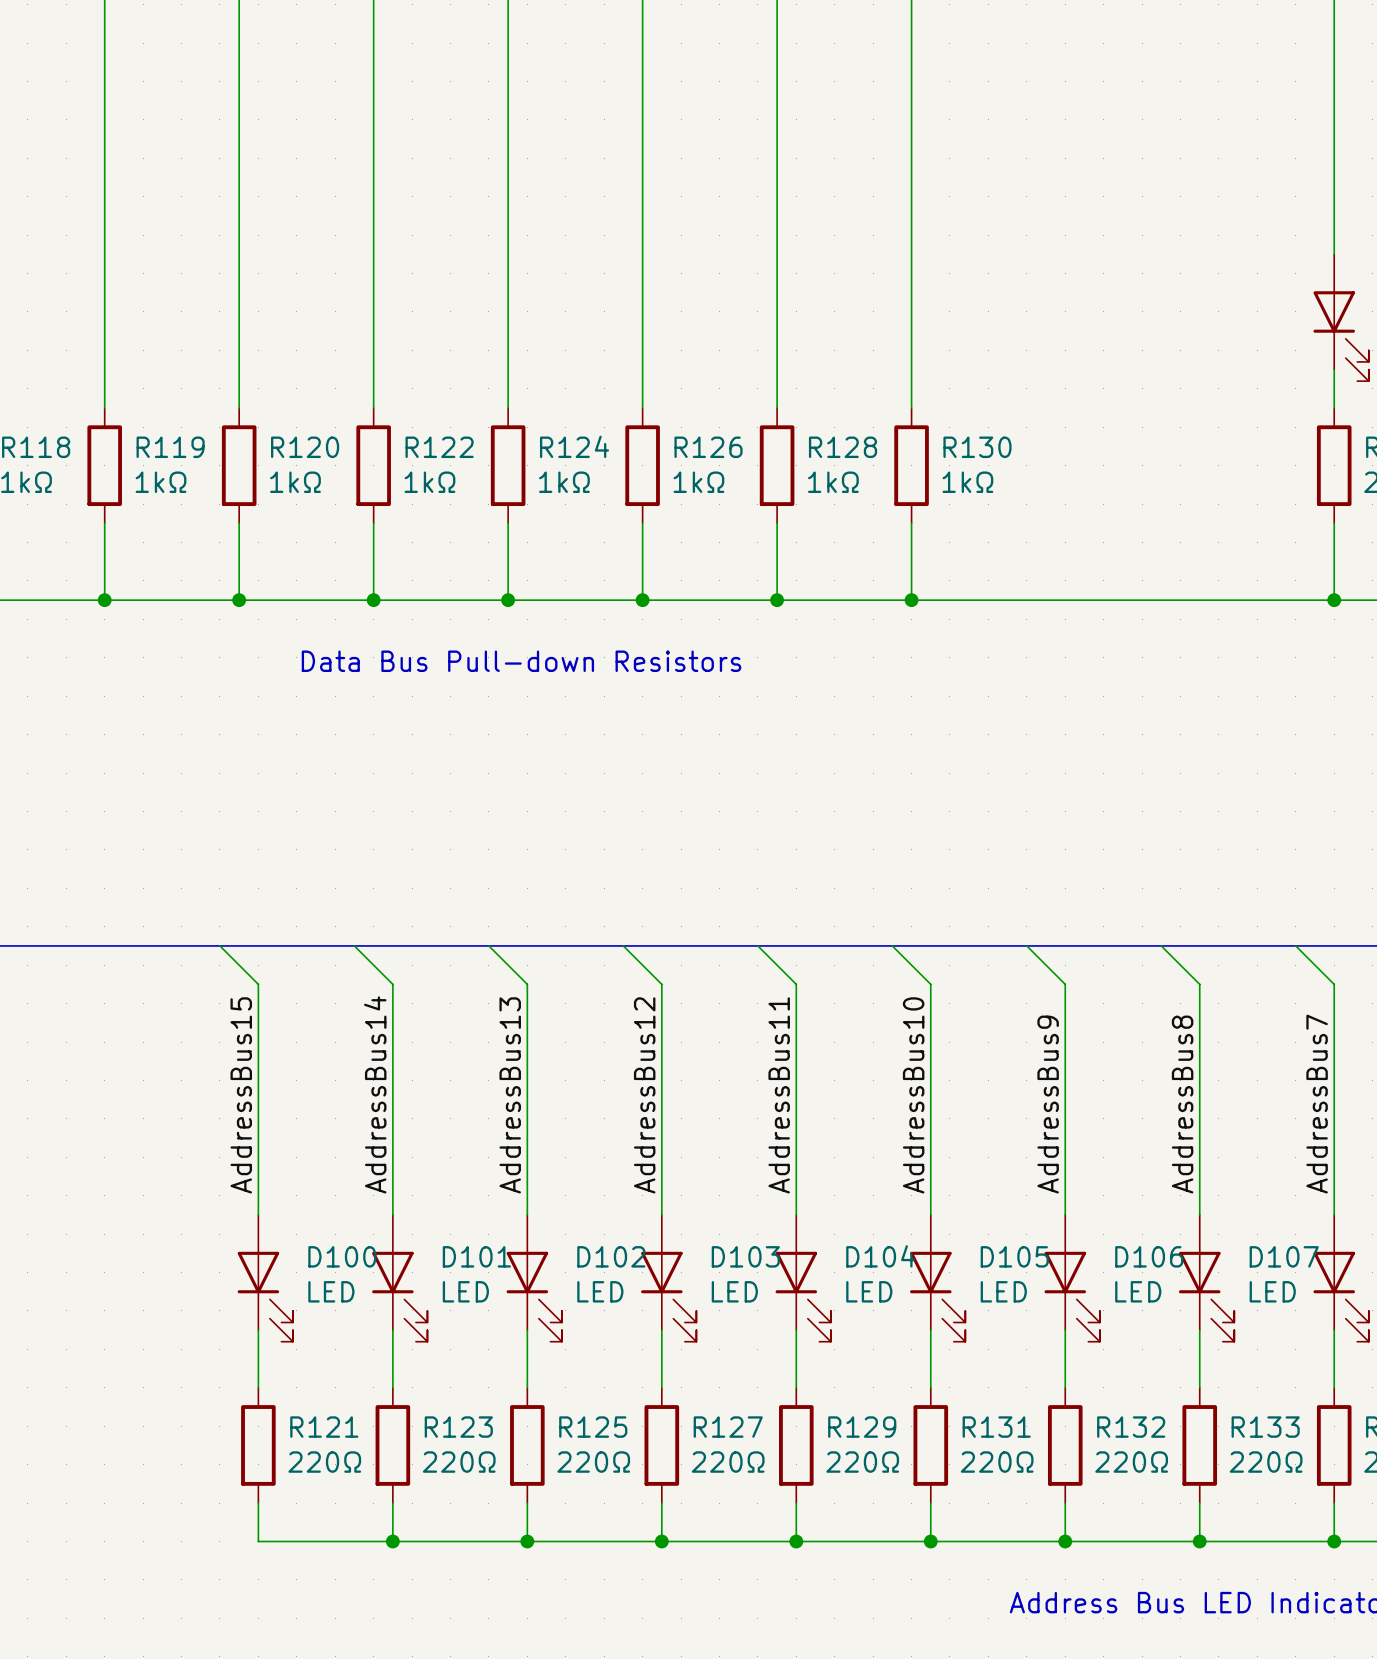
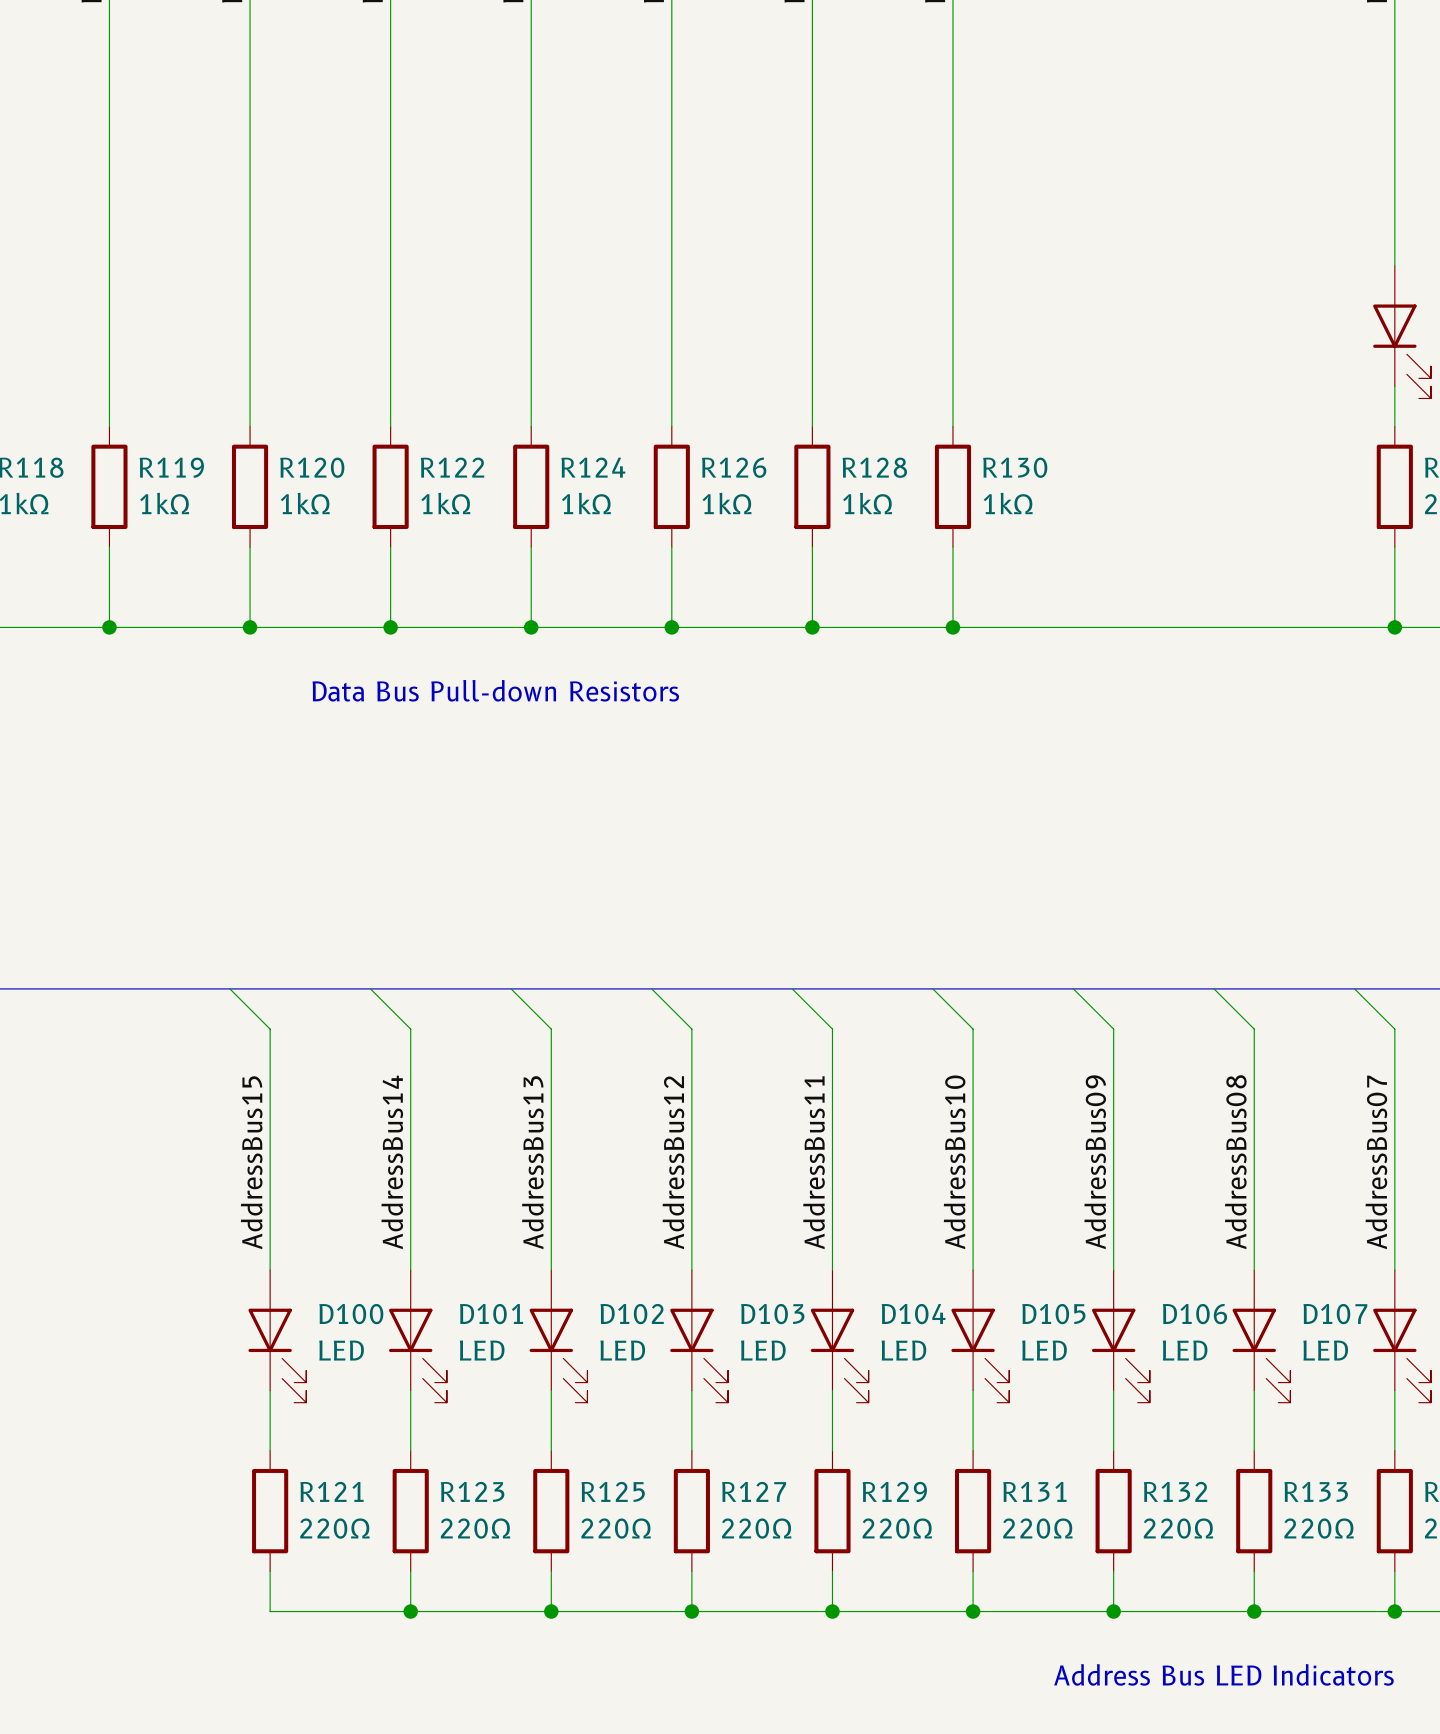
label: AddressBus9 (1048, 1104) -> AddressBus09 (1095, 1162)
label: AddressBus8 (1182, 1104) -> AddressBus08 (1235, 1162)
label: AddressBus7 (1317, 1104) -> AddressBus07 (1376, 1162)

